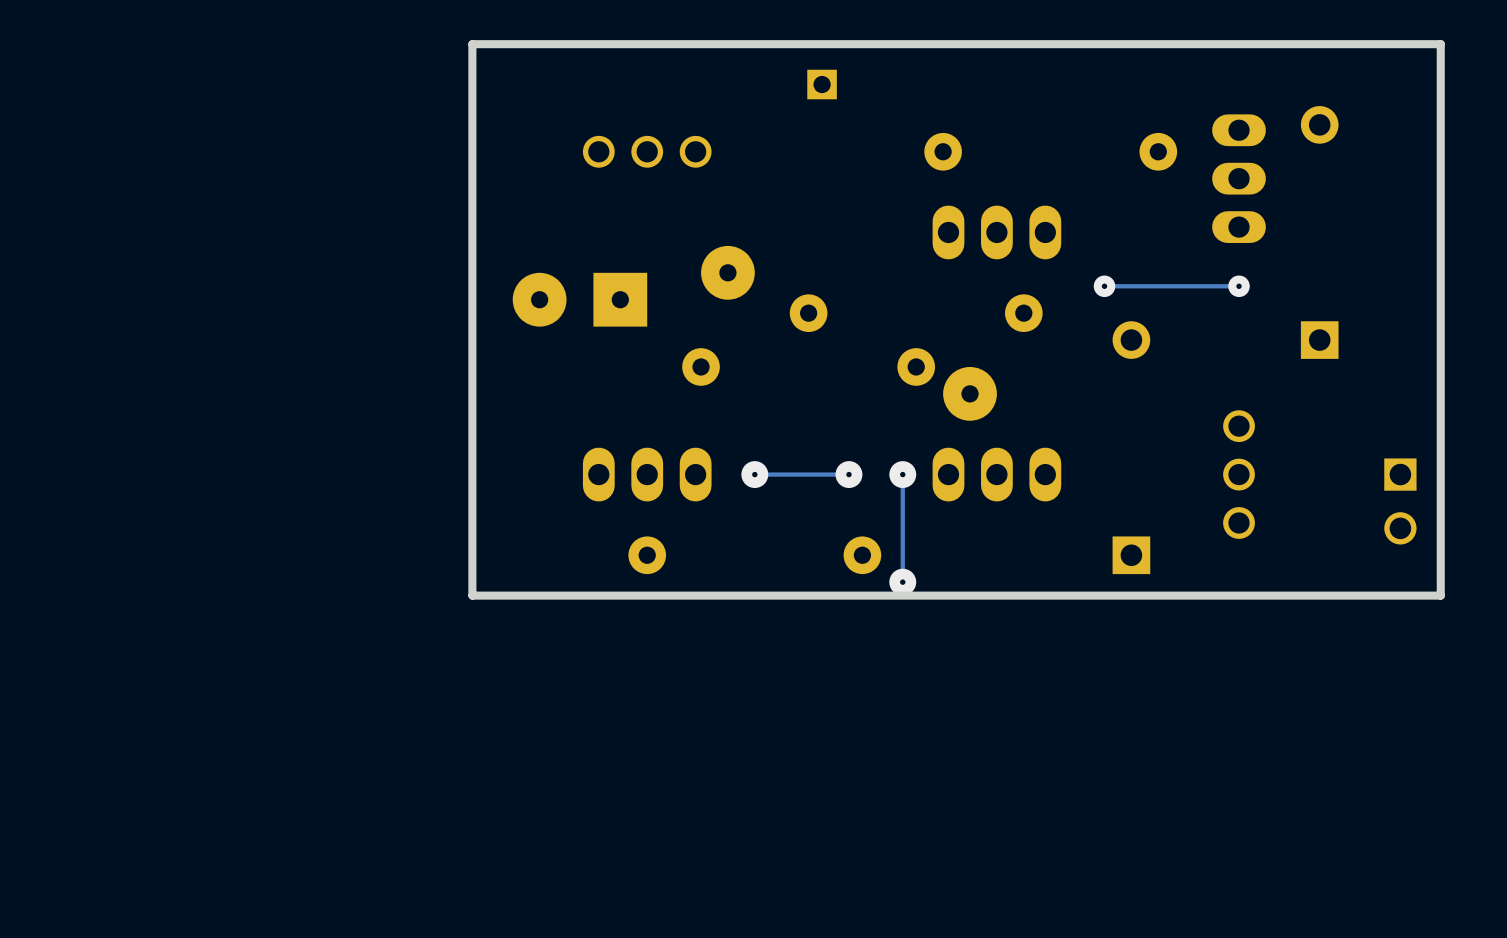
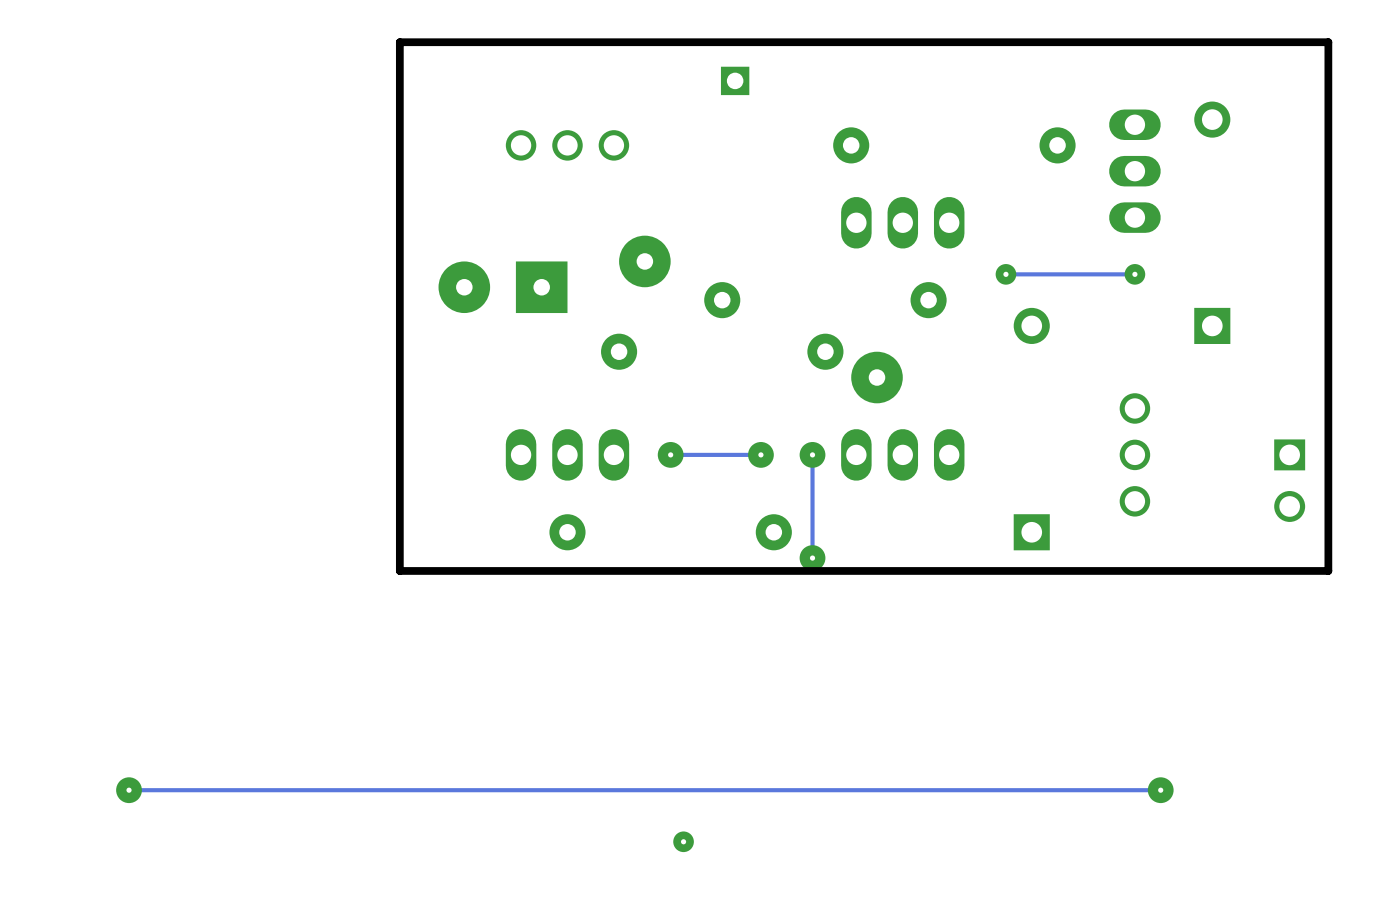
via: none -> (129, 790)
track: none -> (1160, 790) (129, 790)
via: none -> (1160, 790)
via: none -> (683, 841)

